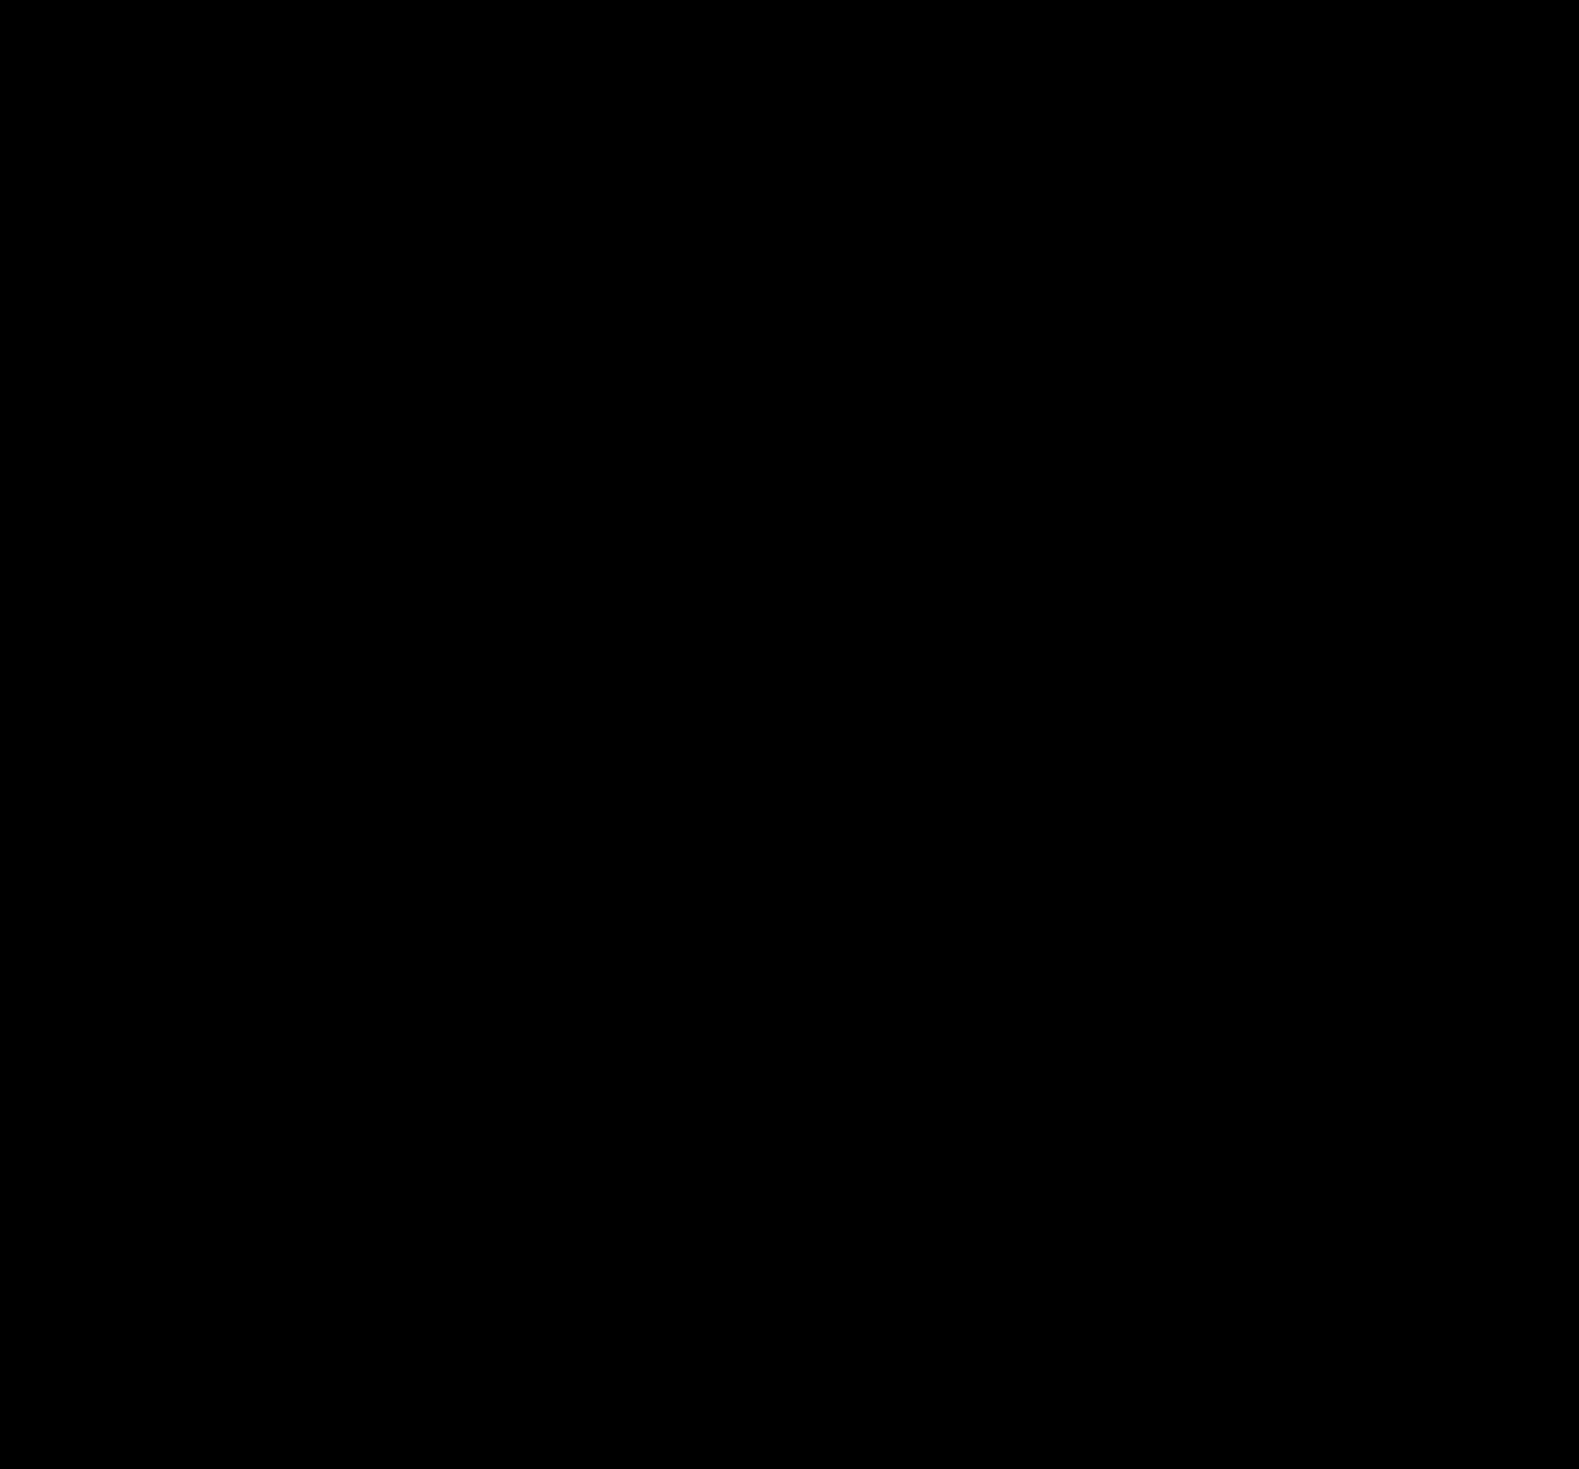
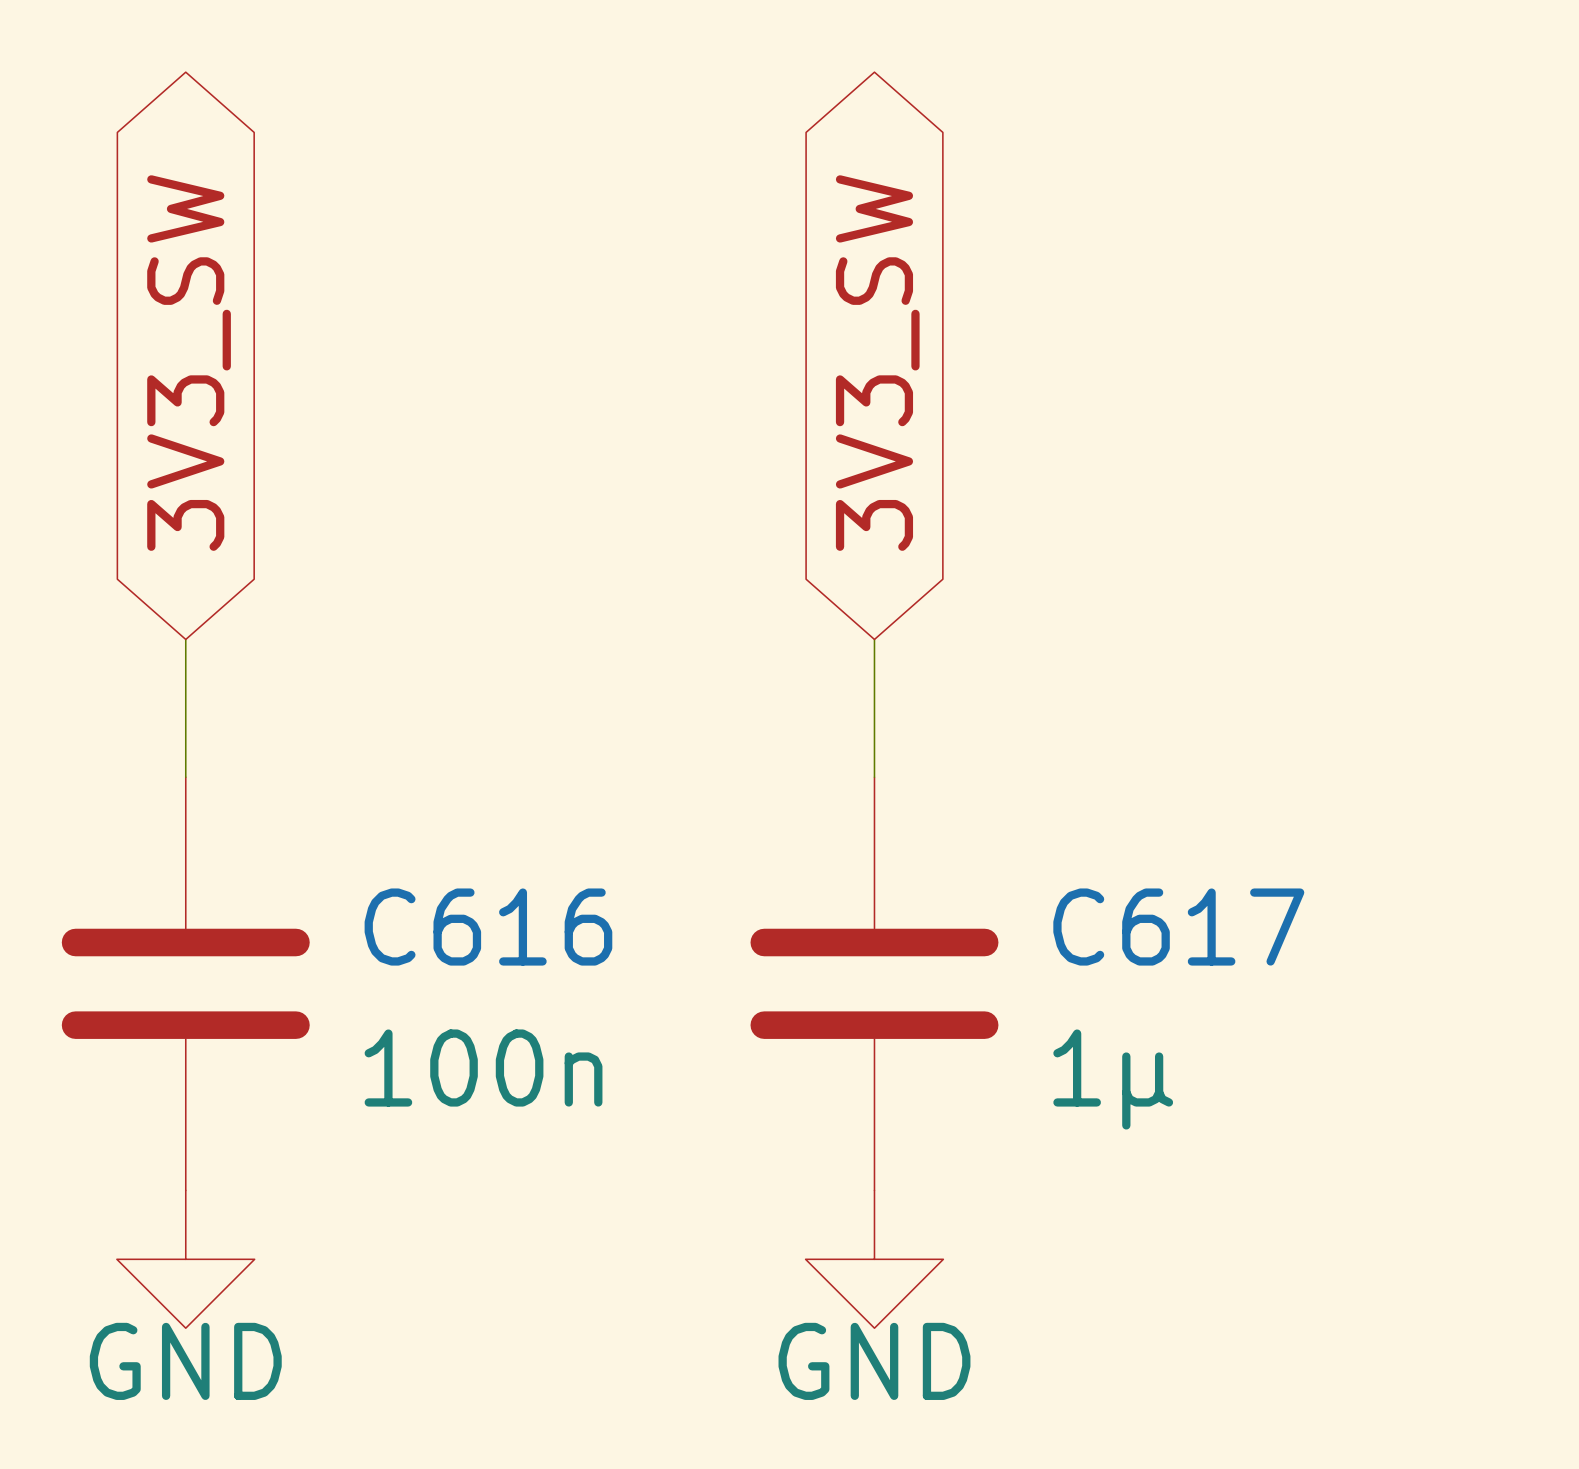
global label: none -> 3V3_SW (189, 363)
global label: none -> 3V3_SW (877, 363)
wire: none -> (185, 639) (185, 777)
wire: none -> (874, 639) (874, 777)
C616: none -> 100n (185, 983)
C617: none -> 1µ (874, 983)
power symbol: none -> GND (185, 1259)
power symbol: none -> GND (874, 1259)

